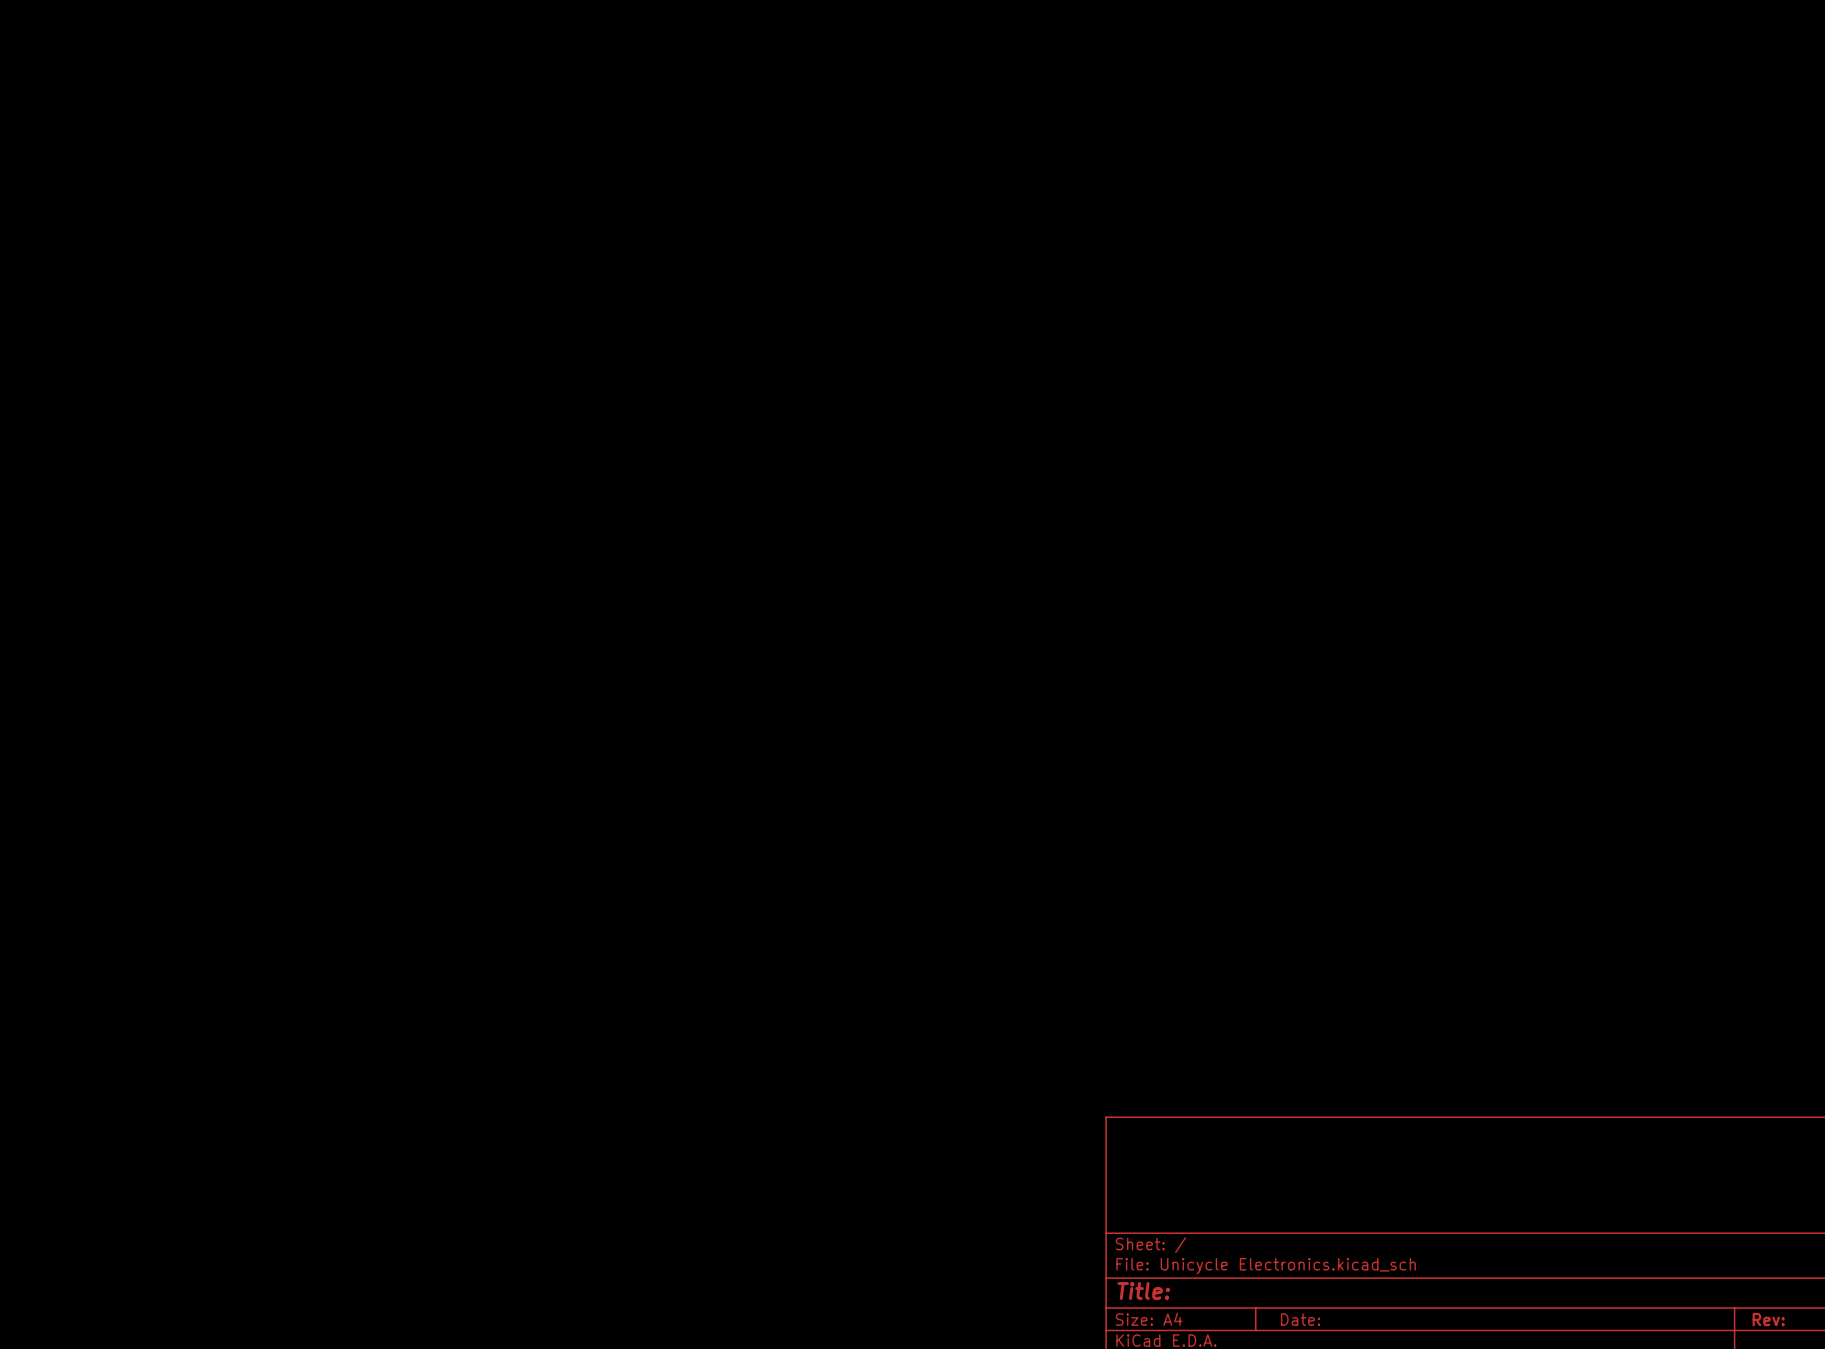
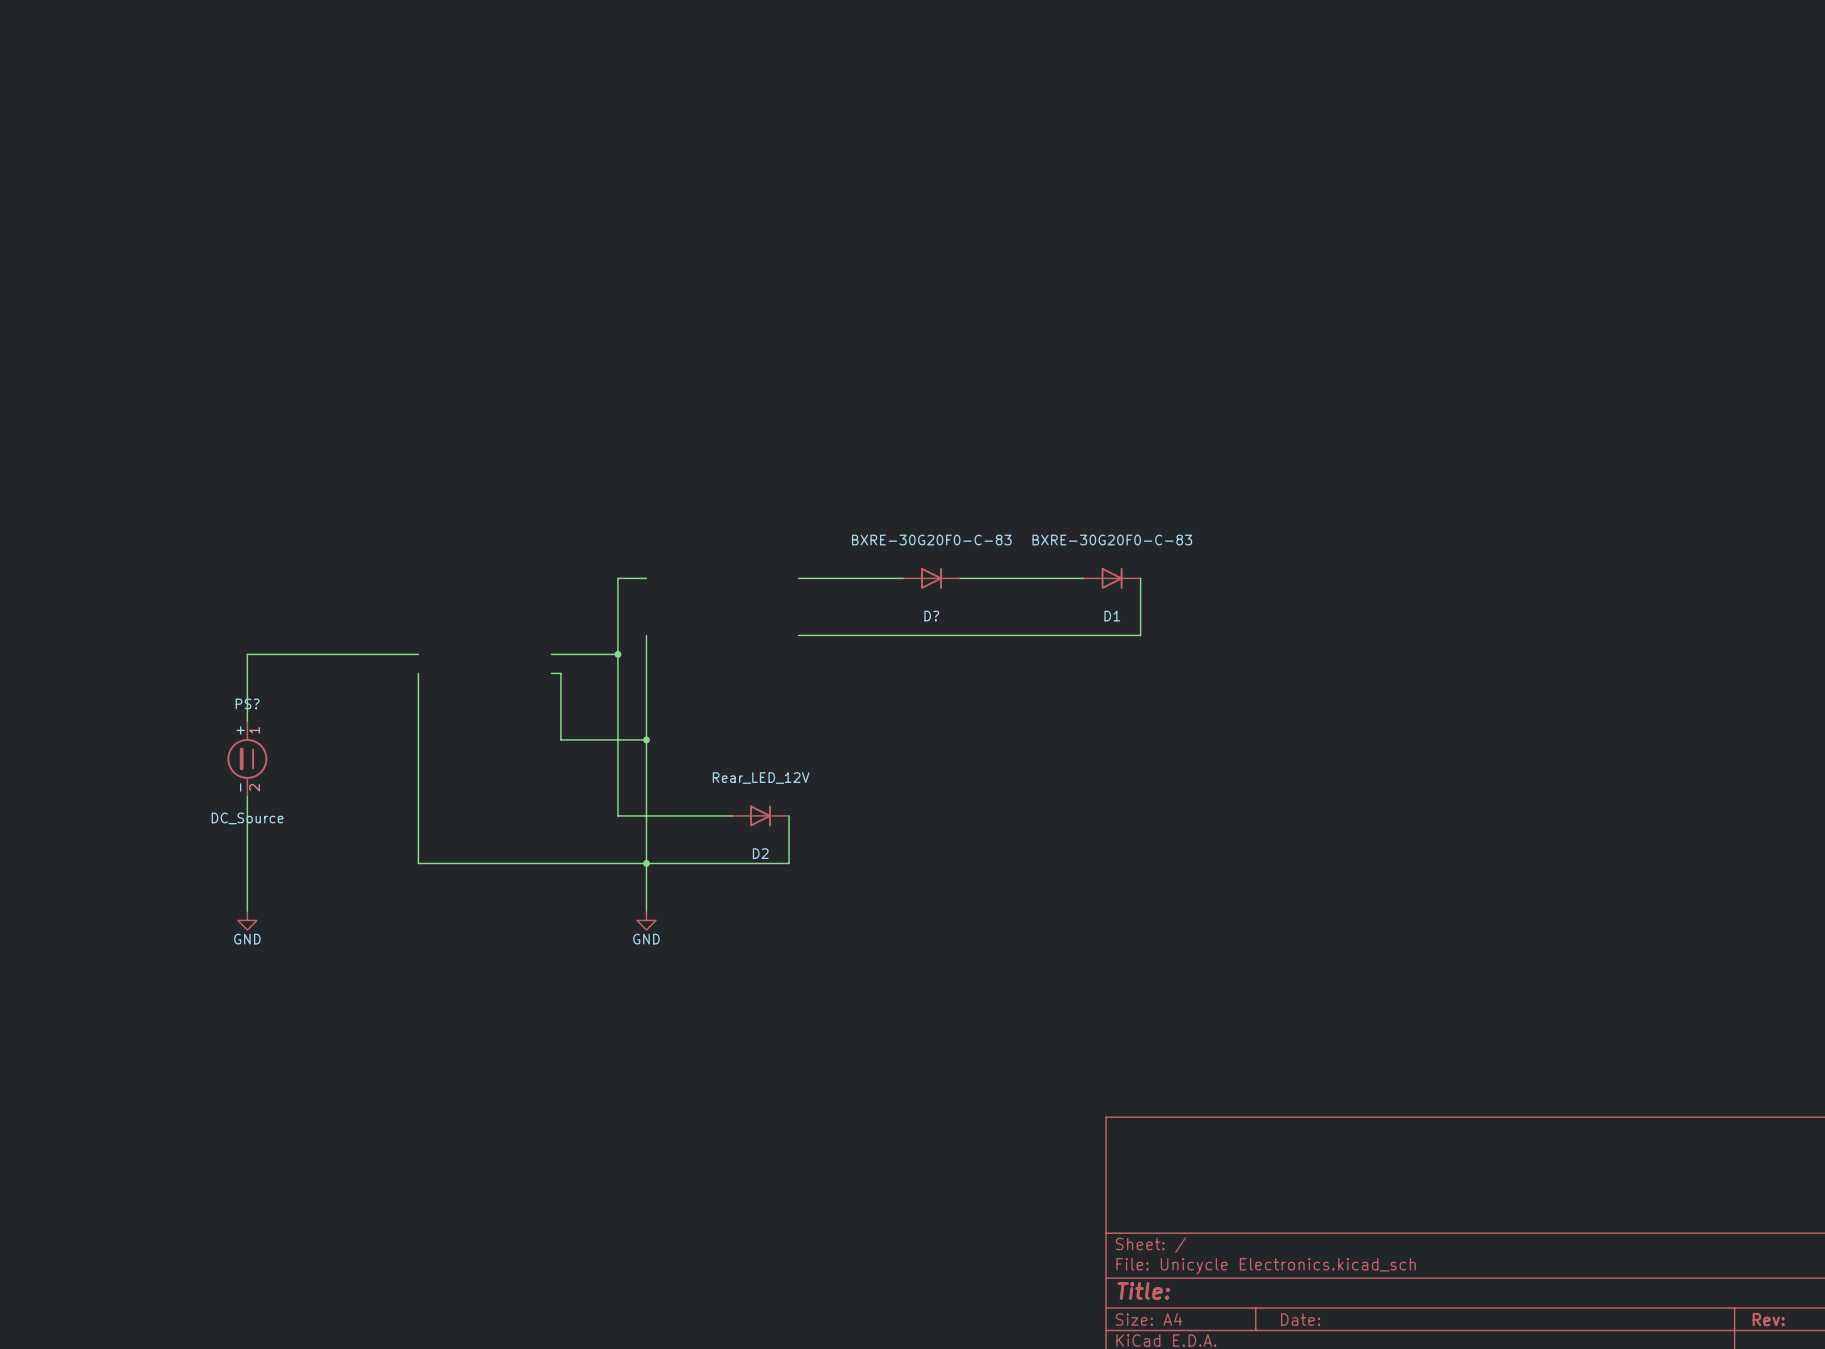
wire: none -> (646, 578) (617, 578) (617, 815) (731, 815)
wire: none -> (798, 578) (903, 578)
D?: none -> BXRE-30G20F0-C-83 (931, 578)
wire: none -> (960, 578) (1083, 578)
D1: none -> BXRE-30G20F0-C-83 (1112, 578)
wire: none -> (1140, 578) (1140, 635) (798, 635)
wire: none -> (646, 635) (646, 910)
wire: none -> (418, 654) (247, 654) (247, 720)
wire: none -> (551, 654) (617, 654)
junction: none -> (617, 654)
wire: none -> (418, 673) (418, 863) (789, 863) (789, 815)
wire: none -> (551, 673) (560, 673) (560, 739) (646, 739)
junction: none -> (646, 739)
PS?: none -> DC_Source (247, 758)
wire: none -> (247, 796) (247, 910)
D2: none -> Rear_LED_12V (760, 815)
junction: none -> (646, 863)
power symbol: none -> GND (247, 920)
power symbol: none -> GND (646, 920)

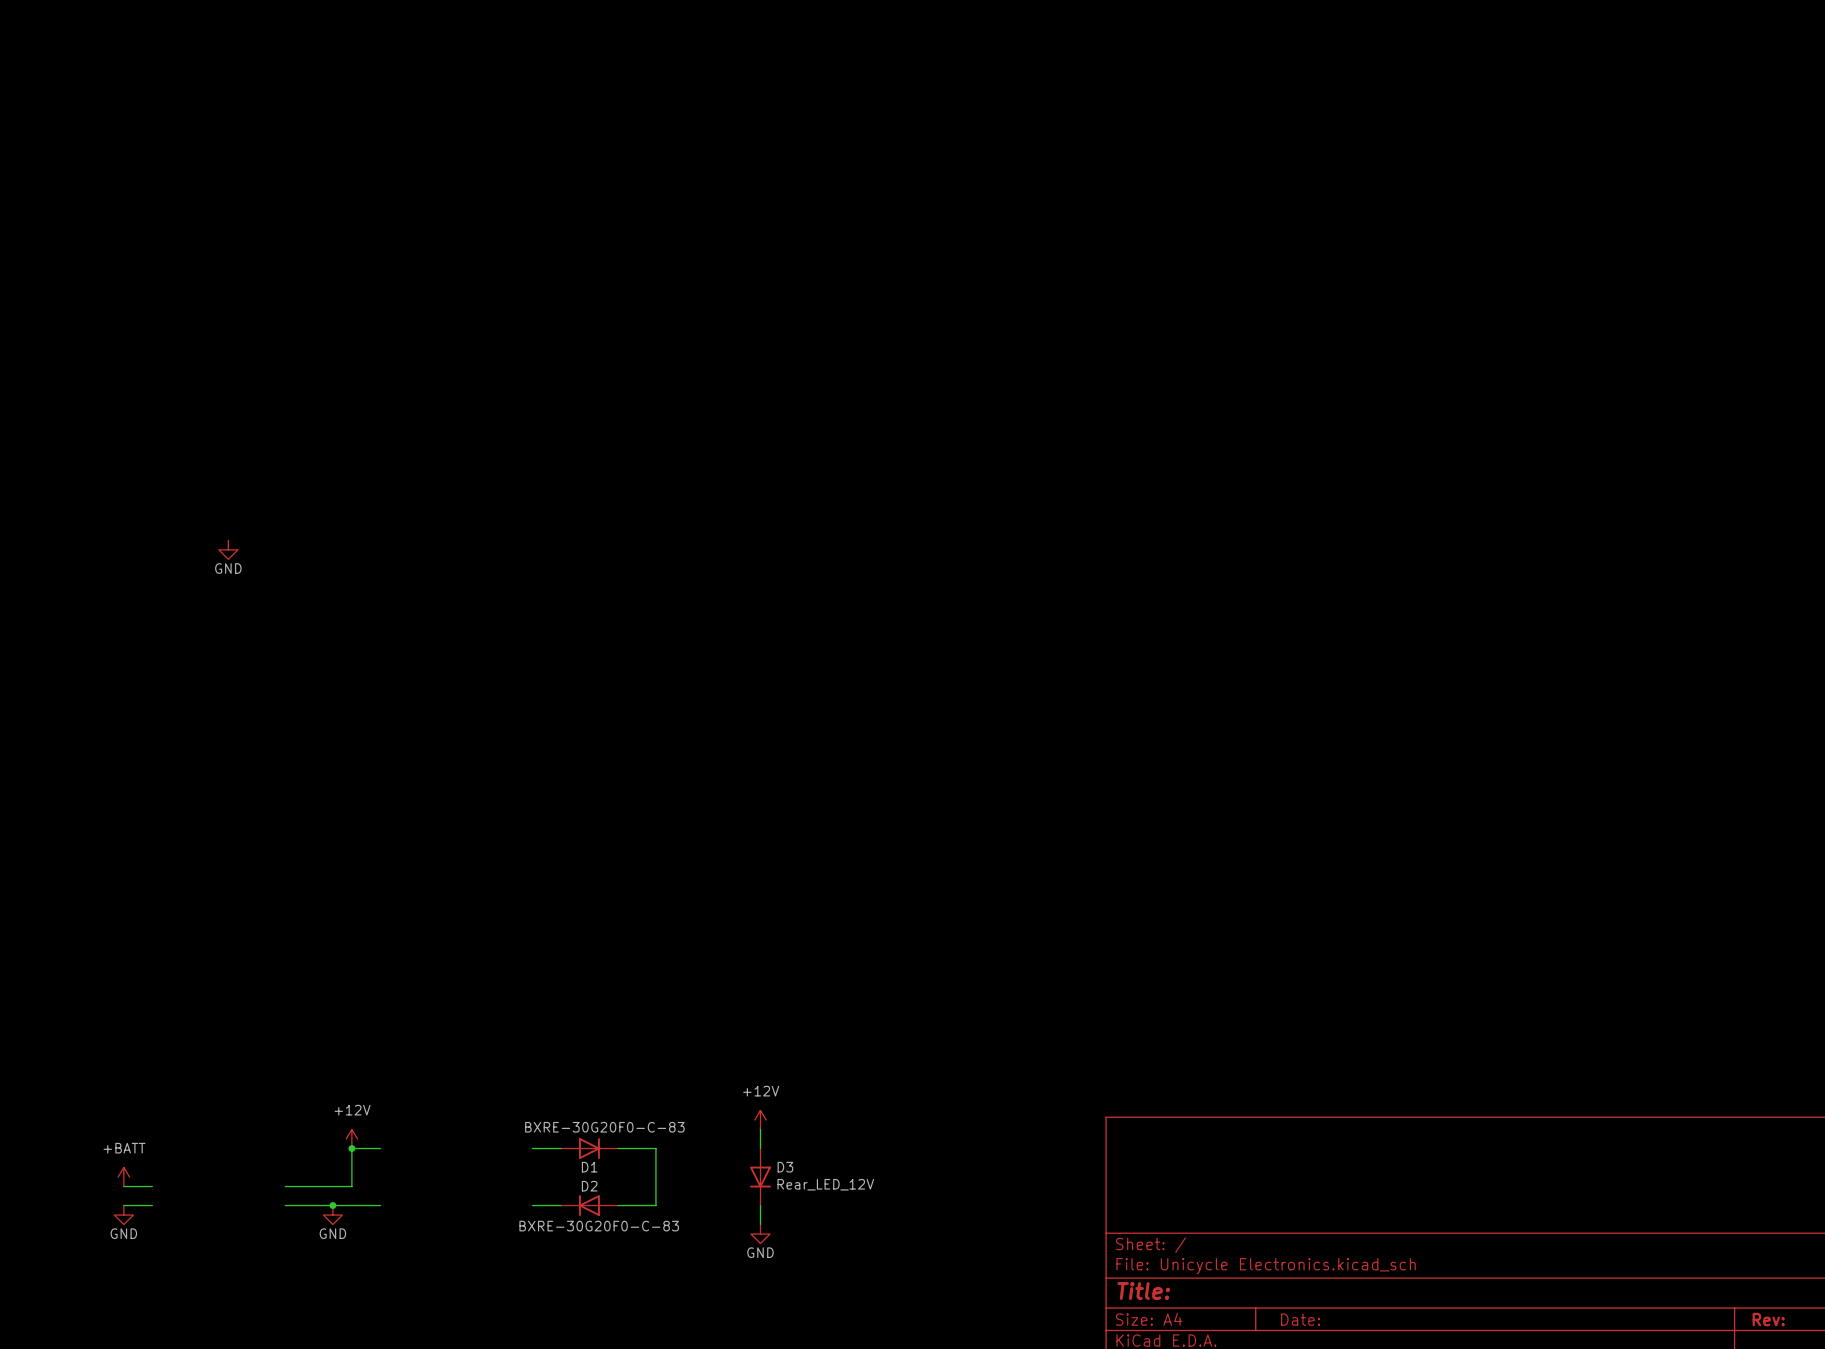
D1 value position: BXRE-30G20F0-C-83 (1112, 540) -> BXRE-30G20F0-C-83 (599, 1226)
power symbol: none -> GND (228, 549)
wire: (646, 578) (617, 578) (617, 815) (731, 815) -> none
wire: (798, 578) (903, 578) -> none
D?: BXRE-30G20F0-C-83 (931, 578) -> none
wire: (960, 578) (1083, 578) -> none
D1 rotation: 0° (1112, 578) -> 180° (589, 1205)
D1 position: (1112, 578) -> (589, 1205)
wire: (1140, 578) (1140, 635) (798, 635) -> none
wire: (646, 635) (646, 910) -> none
wire: (418, 654) (247, 654) (247, 720) -> none
wire: (551, 654) (617, 654) -> none
junction: (617, 654) -> none
wire: (418, 673) (418, 863) (789, 863) (789, 815) -> none
wire: (551, 673) (560, 673) (560, 739) (646, 739) -> none
junction: (646, 739) -> none
PS?: DC_Source (247, 758) -> none
D2 value: Rear_LED_12V (761, 778) -> BXRE-30G20F0-C-83 (604, 1127)
wire: (247, 796) (247, 910) -> none
D2 position: (760, 815) -> (589, 1148)
junction: (646, 863) -> none
power symbol: GND (247, 920) -> none
power symbol: GND (646, 920) -> none
power symbol: none -> +12V (760, 1120)
wire: none -> (760, 1129) (760, 1148)
power symbol: none -> +12V (351, 1139)
junction: none -> (351, 1148)
wire: none -> (380, 1148) (351, 1148) (351, 1186) (285, 1186)
wire: none -> (532, 1148) (560, 1148)
wire: none -> (617, 1148) (655, 1148) (655, 1205) (617, 1205)
power symbol: none -> +BATT (123, 1177)
D3: none -> Rear_LED_12V (760, 1177)
wire: none -> (123, 1186) (152, 1186)
wire: none -> (123, 1205) (152, 1205)
wire: none -> (285, 1205) (380, 1205)
junction: none -> (332, 1205)
wire: none -> (532, 1205) (560, 1205)
wire: none -> (760, 1205) (760, 1224)
power symbol: none -> GND (123, 1215)
power symbol: none -> GND (332, 1215)
power symbol: none -> GND (760, 1234)

